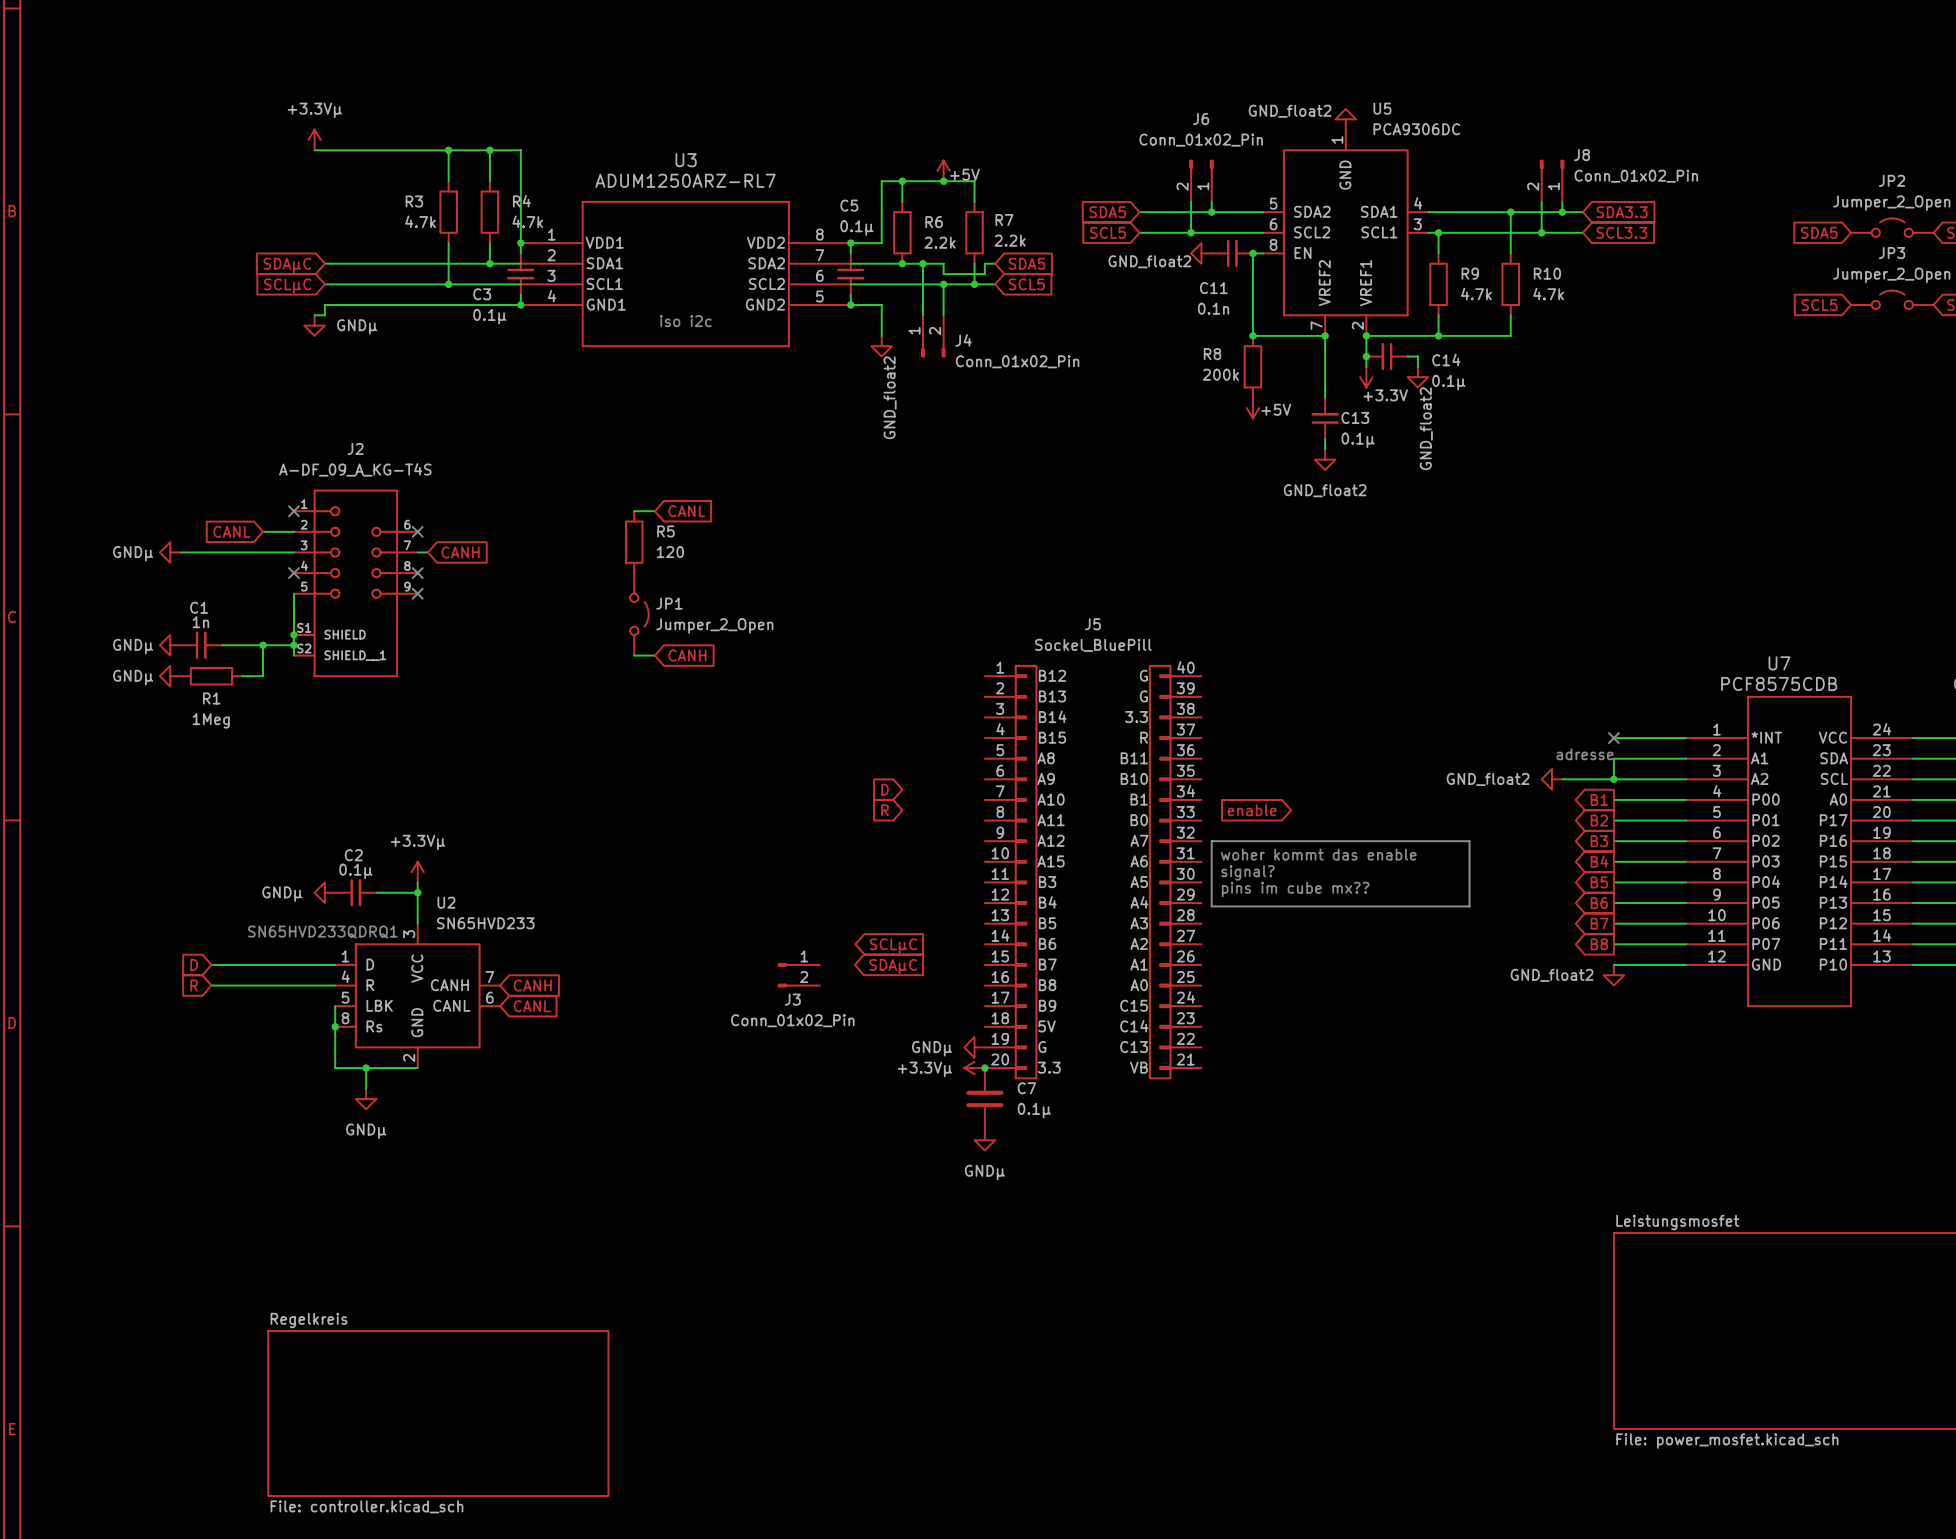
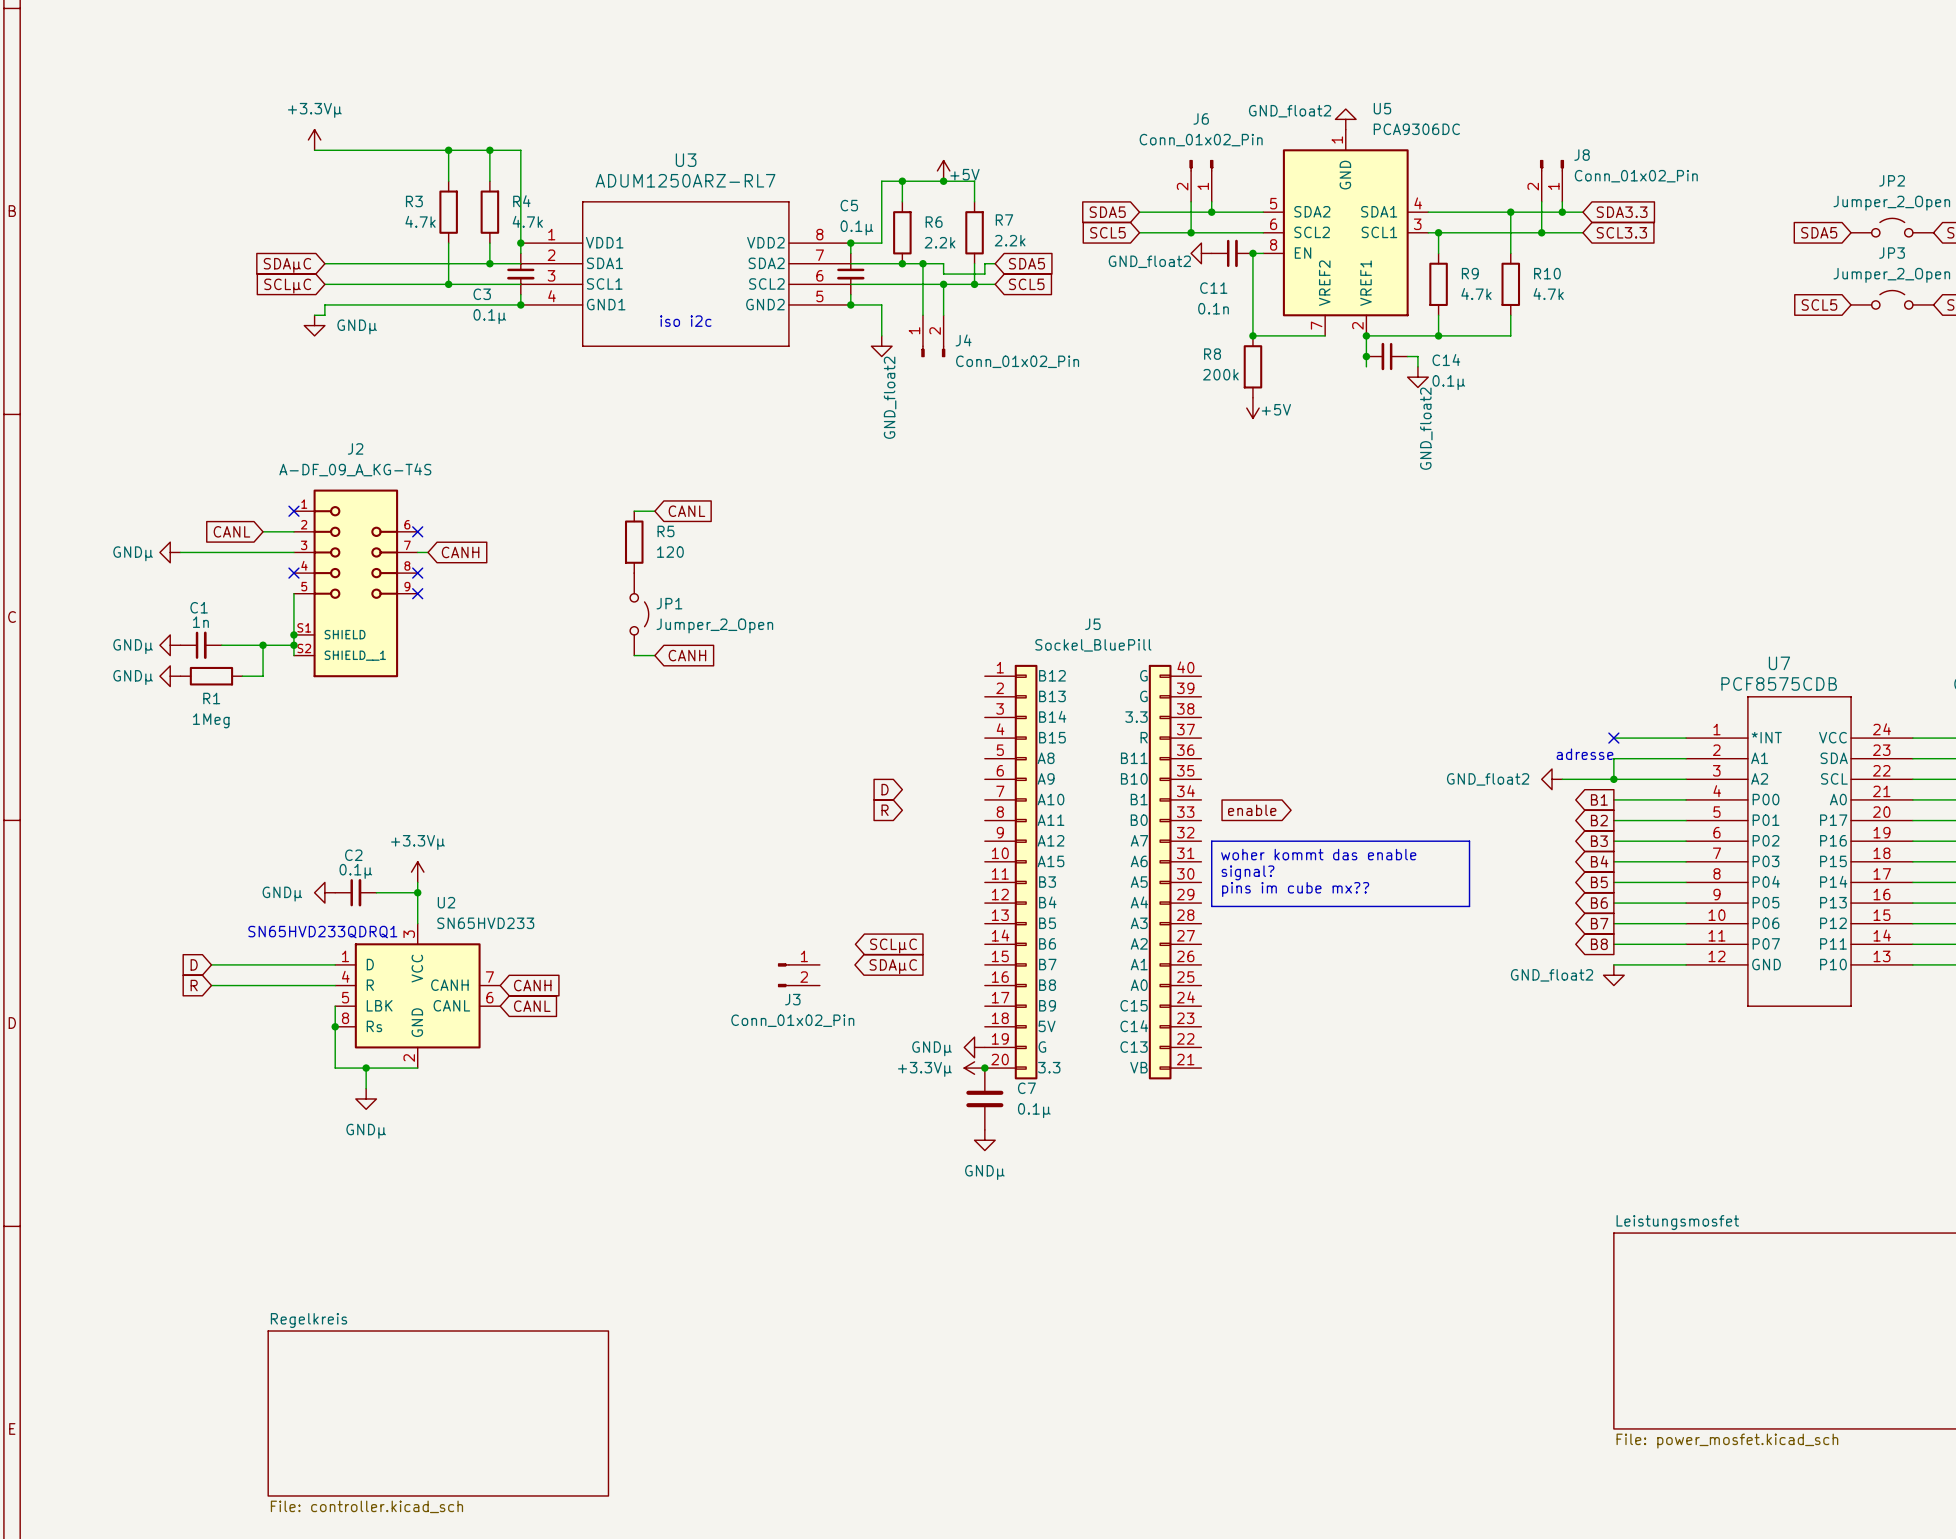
wire: (1325, 335) (1325, 397) -> none
junction: (1325, 335) -> none
power symbol: +3.3V (1366, 377) -> none
C13: 0.1µ (1325, 418) -> none
wire: (1325, 439) (1325, 449) -> none
power symbol: GND_float2 (1325, 459) -> none

